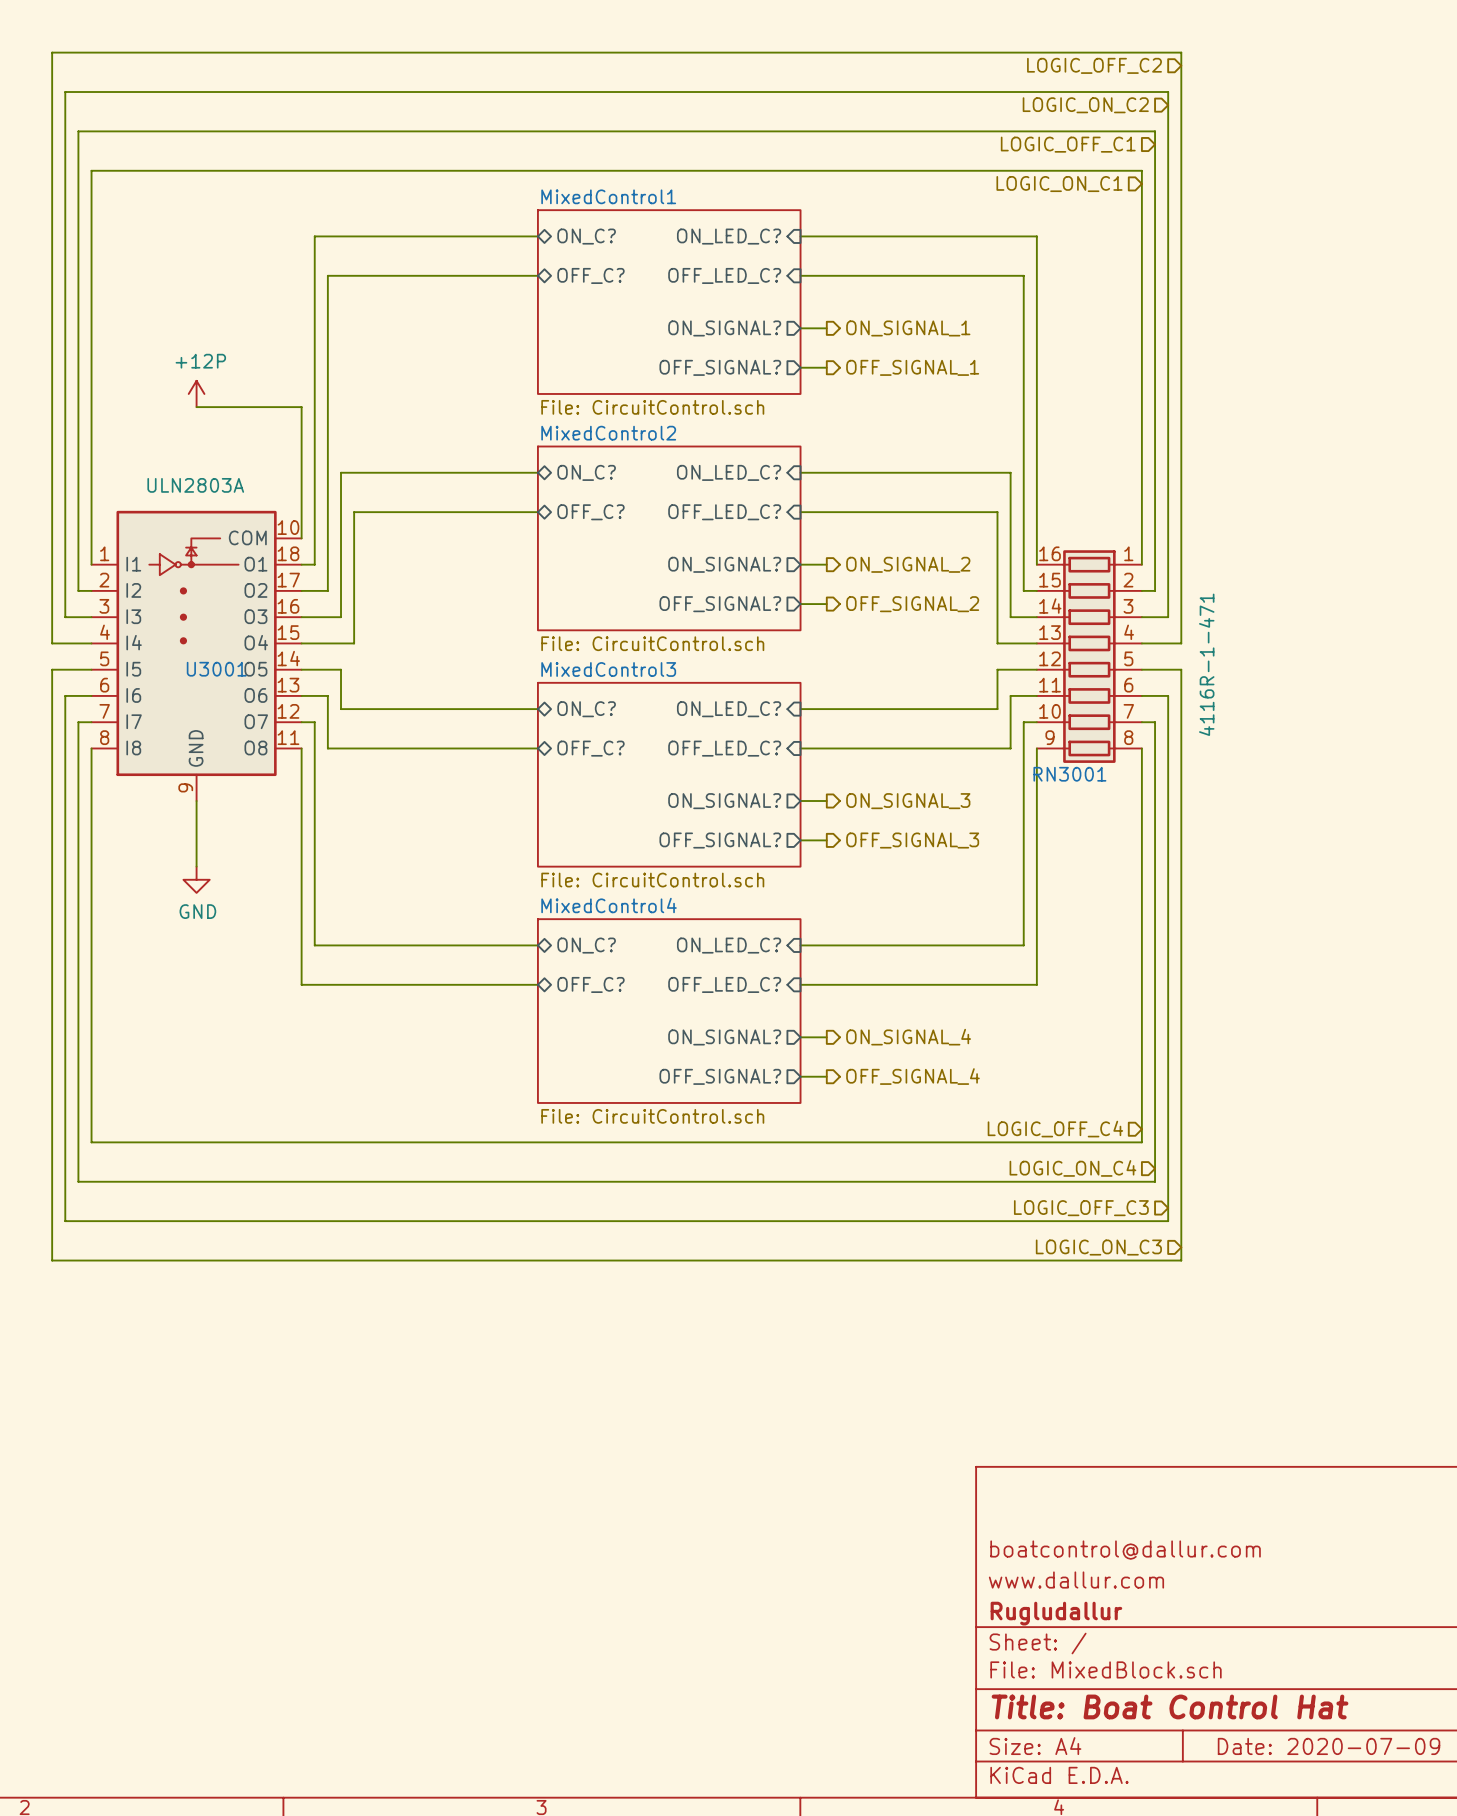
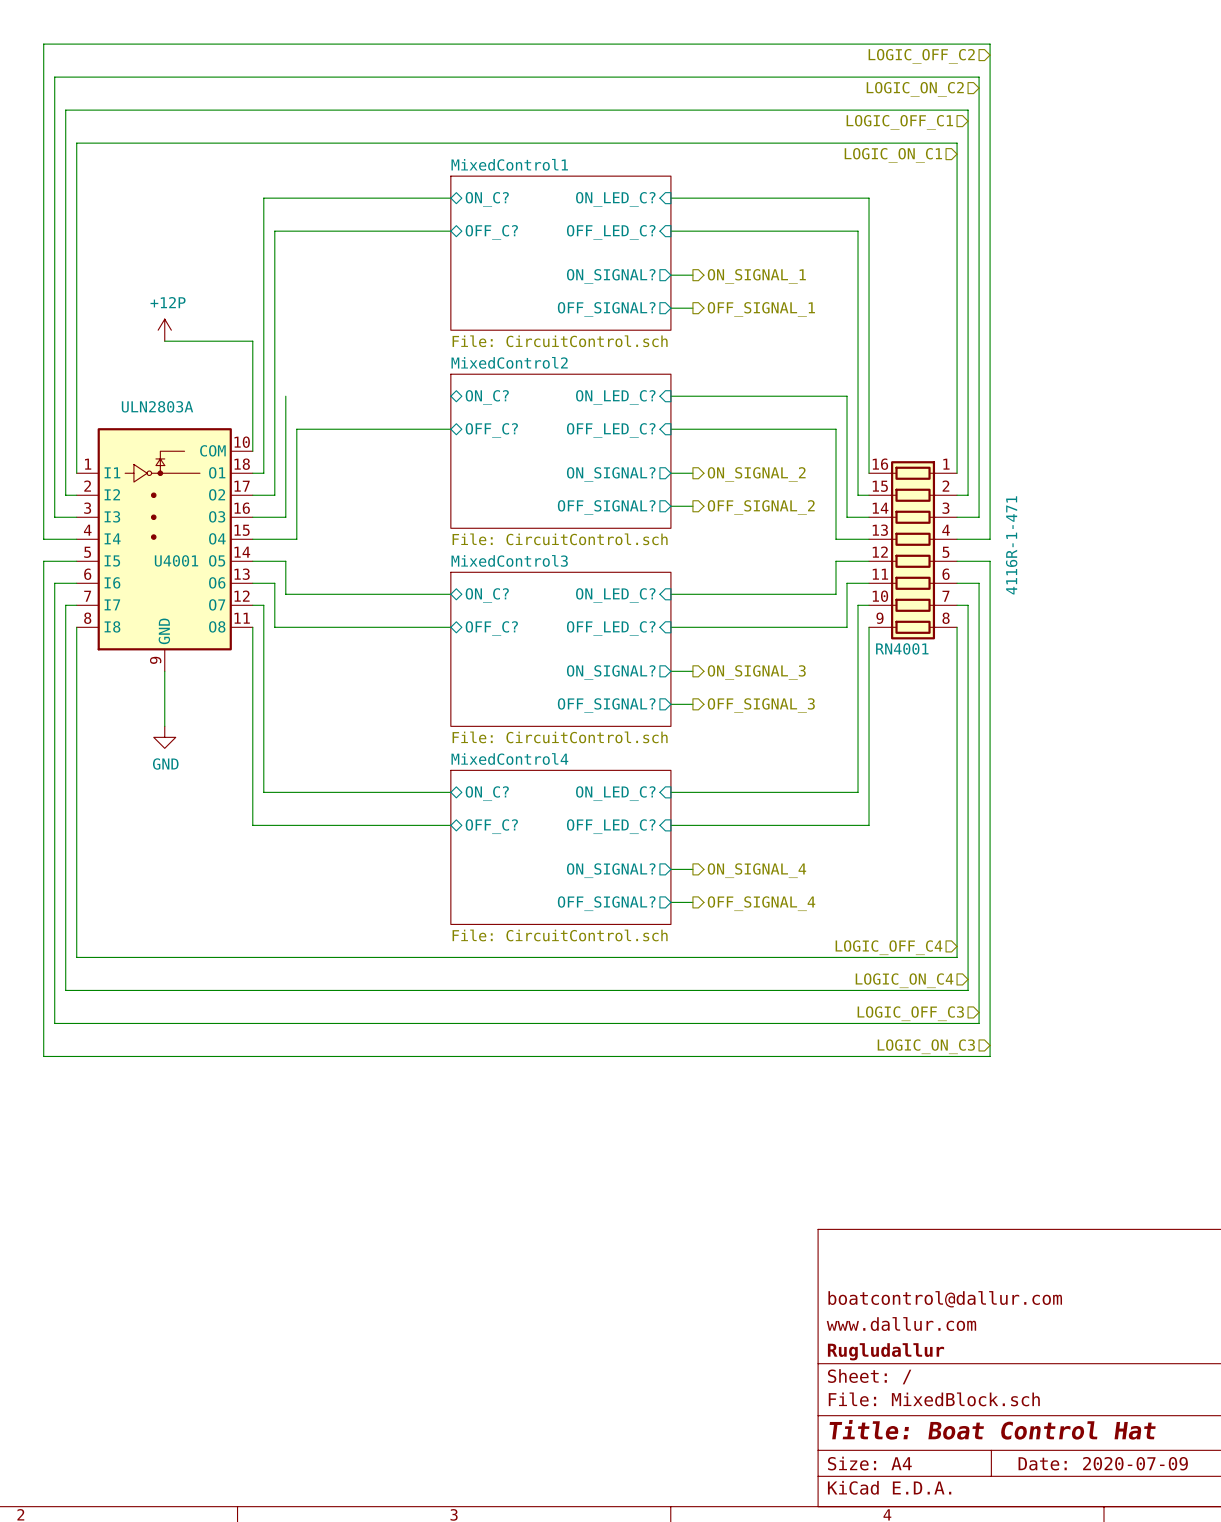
wire: (341, 472) (537, 472) -> none
U3001 name: U3001 (216, 669) -> U4001 (176, 560)
RN3001 name: RN3001 (1069, 774) -> RN4001 (902, 648)

